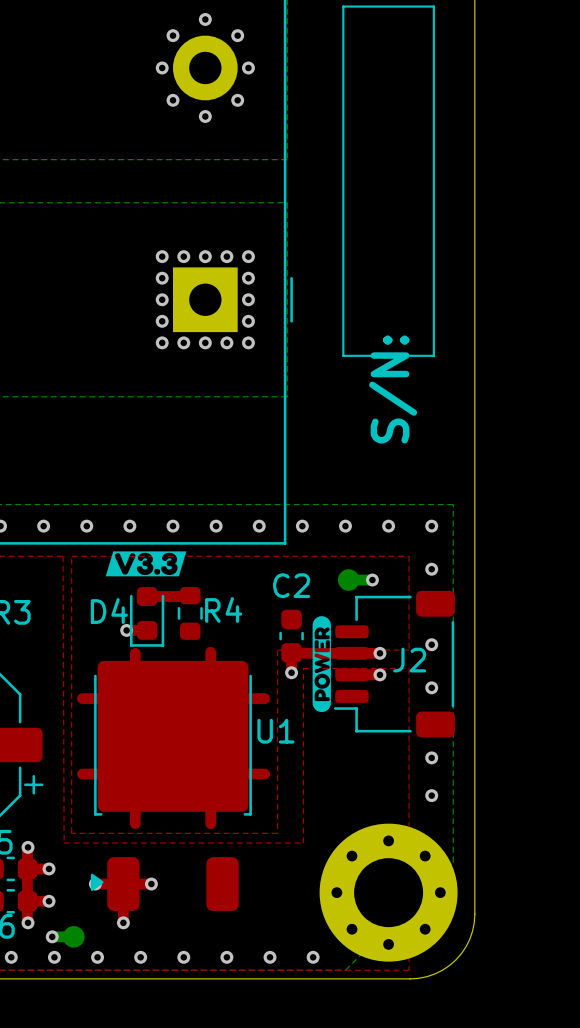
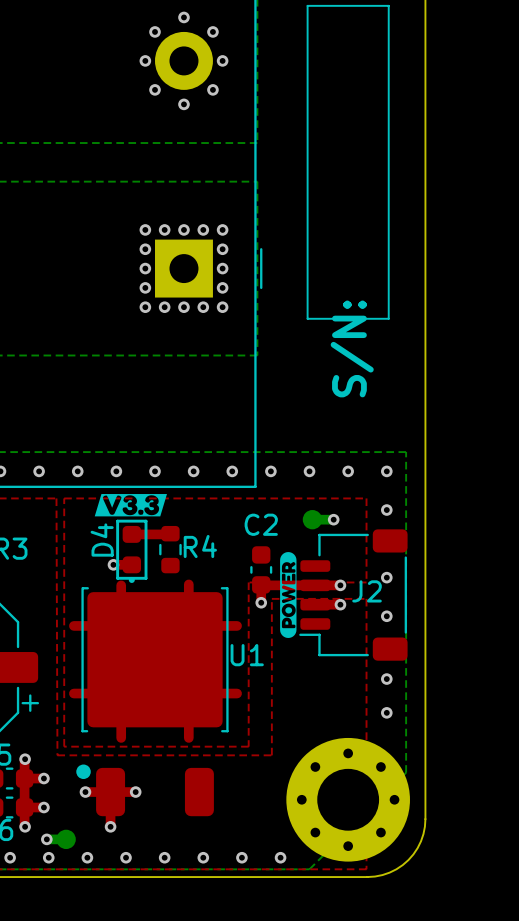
D4 footprint: [129, 587, 165, 647] -> [116, 519, 148, 583]
D4 name rotation: 0° (109, 611) -> 90° counterclockwise (102, 540)
U1 footprint: [90, 660, 252, 911] -> [76, 587, 229, 817]

